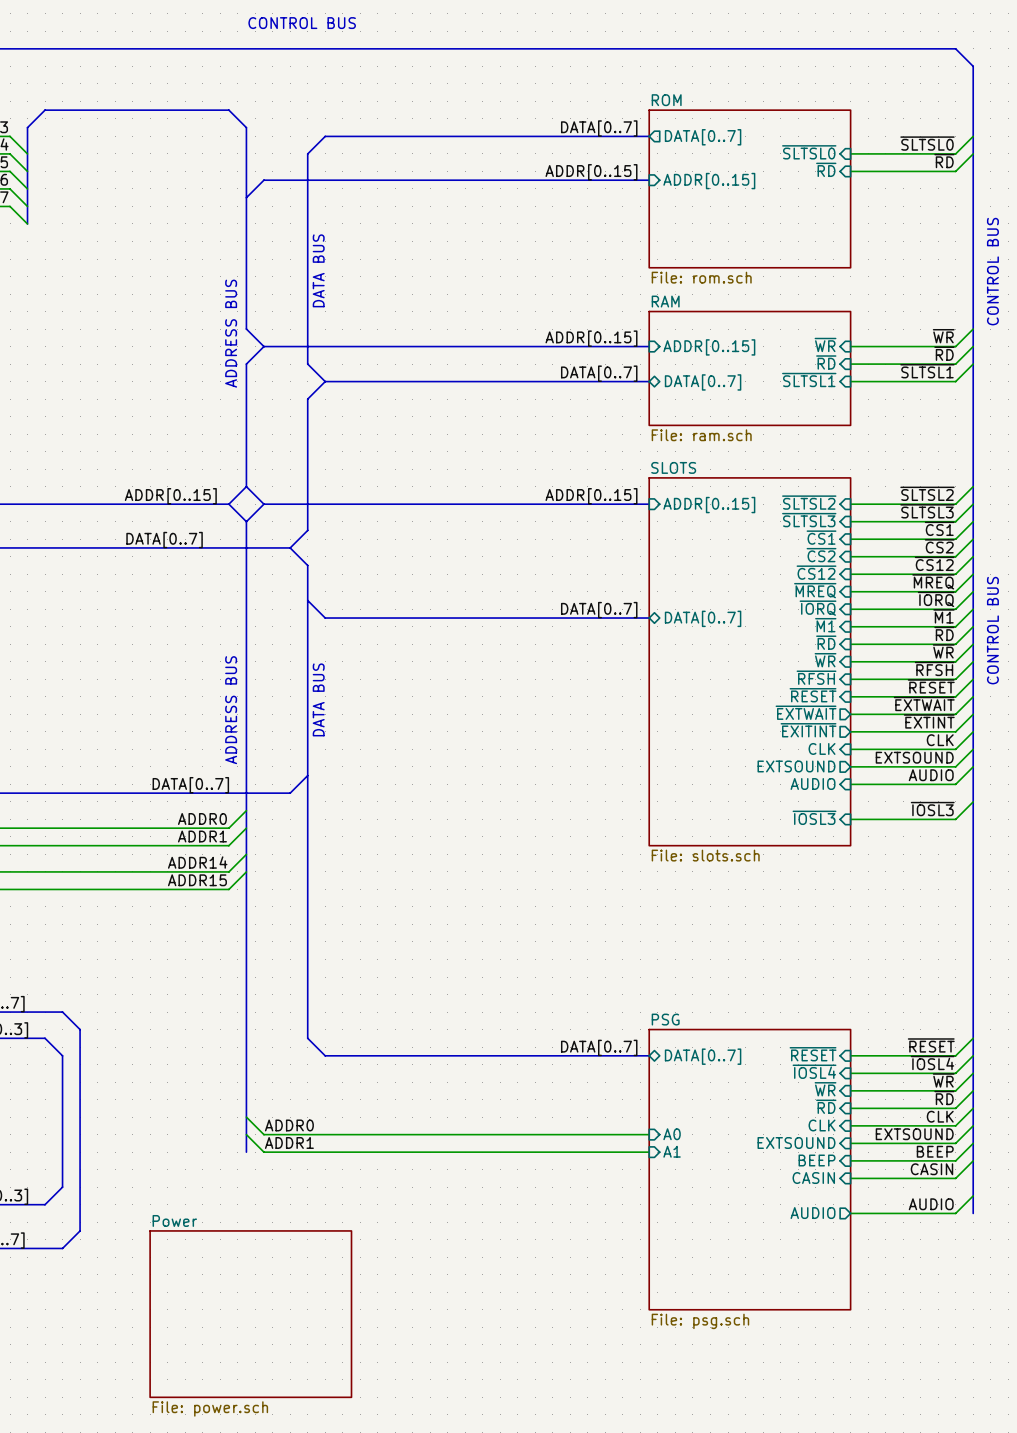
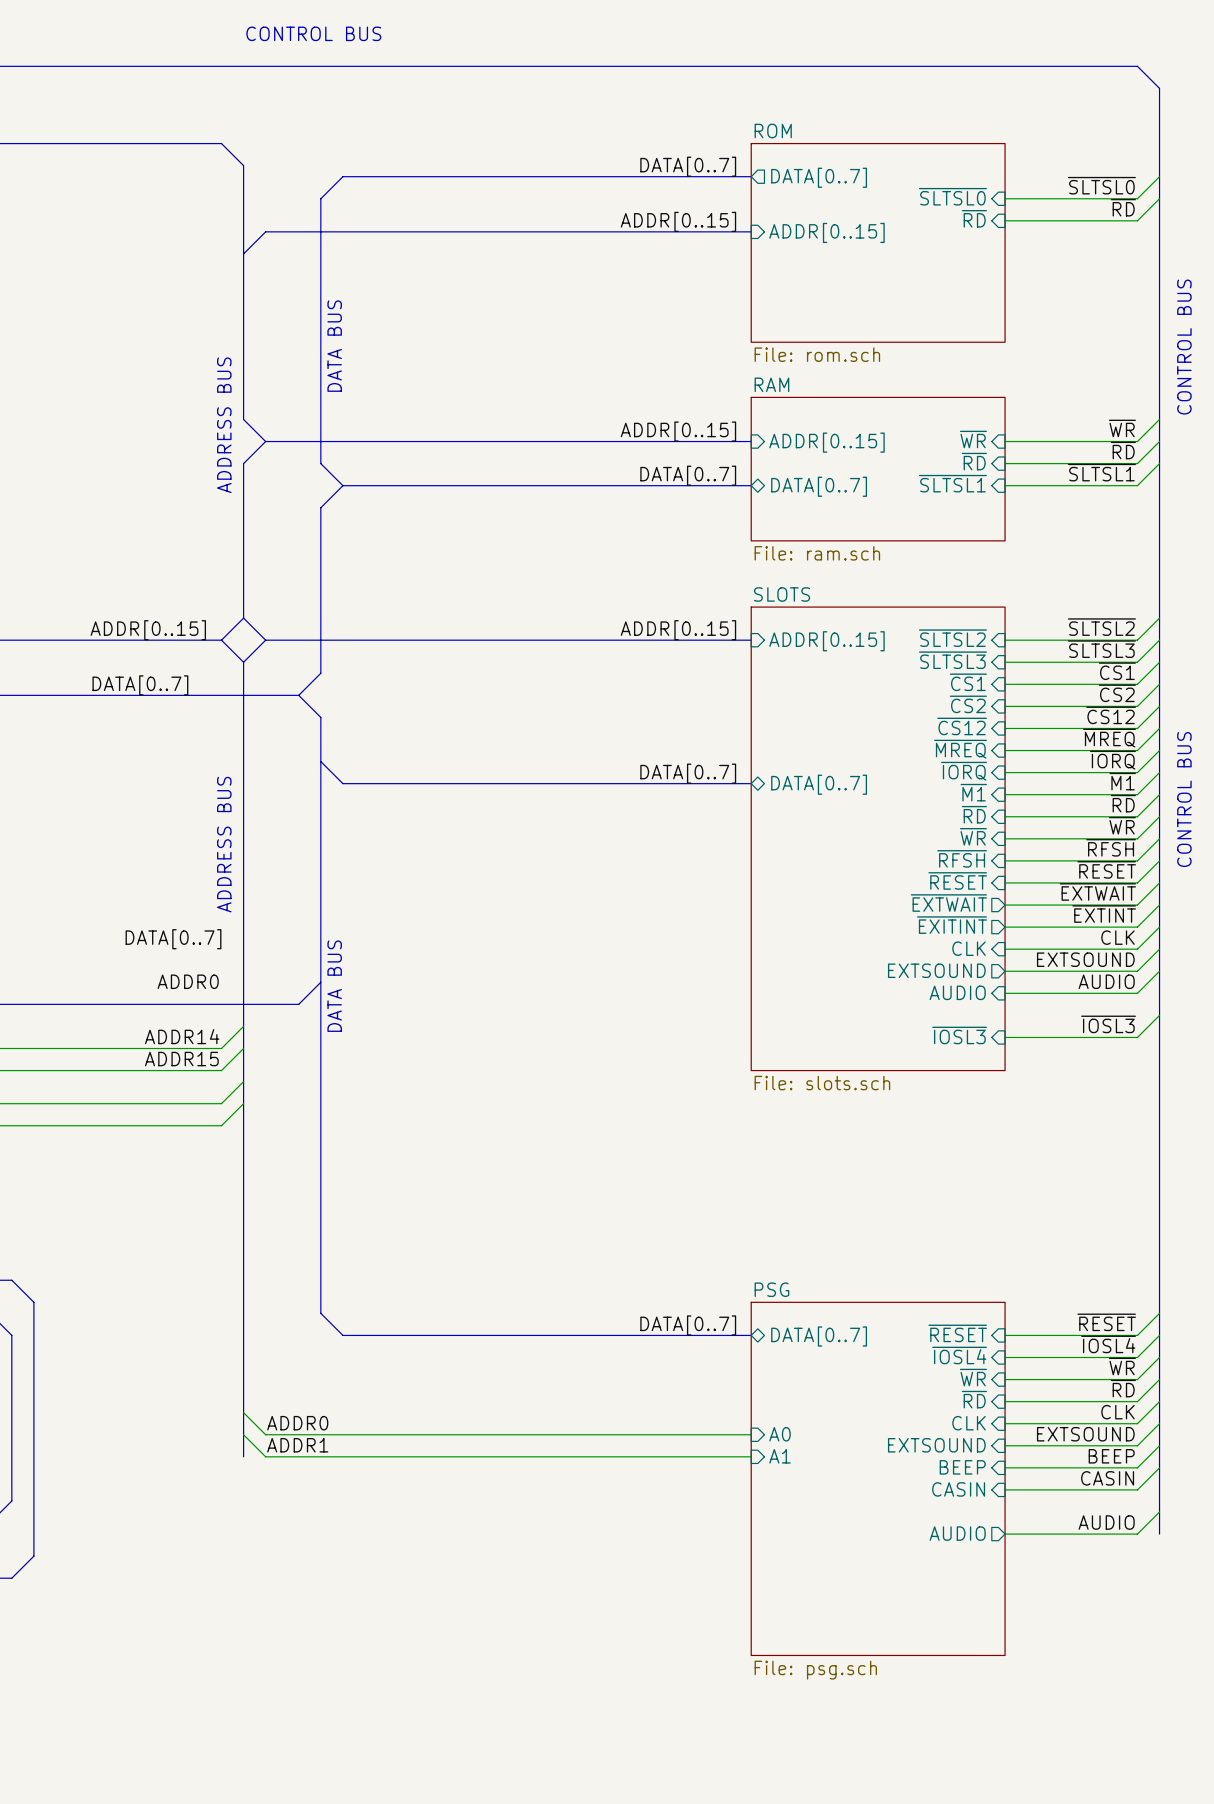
text position: DATA BUS (318, 699) -> DATA BUS (334, 986)
text position: ADDRESS BUS (231, 710) -> ADDRESS BUS (224, 844)
label: none -> ADDR0 (188, 981)
label position: DATA[0..7] (190, 785) -> DATA[0..7] (173, 939)
label: ADDR0 (202, 819) -> ADDR14 (182, 1036)
label: ADDR1 (202, 836) -> ADDR15 (181, 1059)
label: ADDR14 (197, 862) -> none
label: ADDR15 (197, 880) -> none
sheet Power: File: power.sch (250, 1314) -> none

